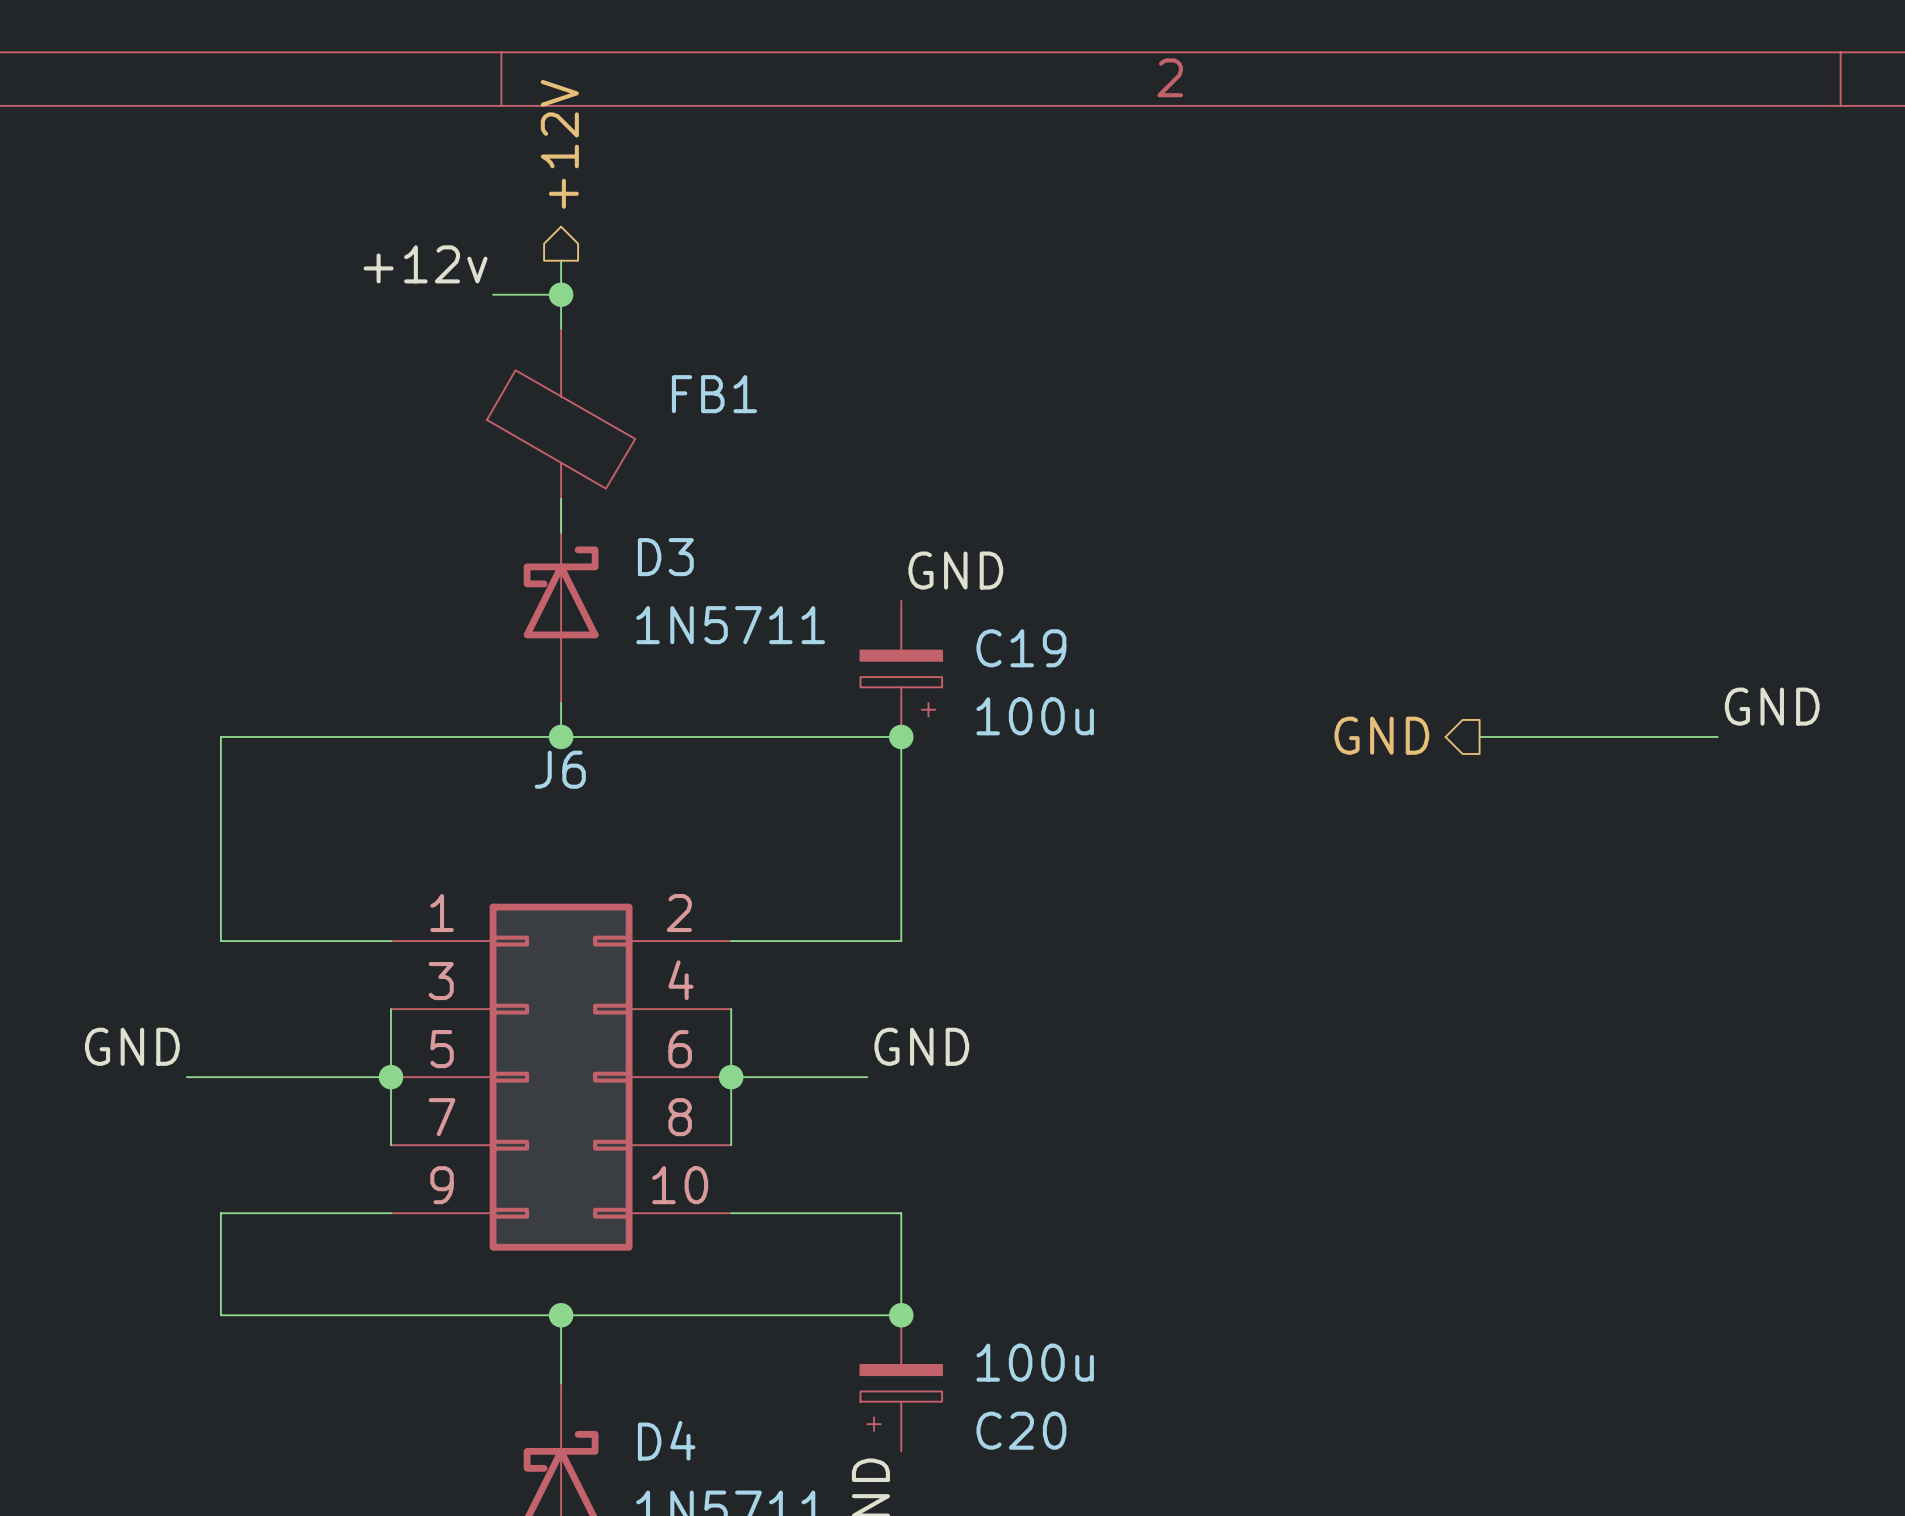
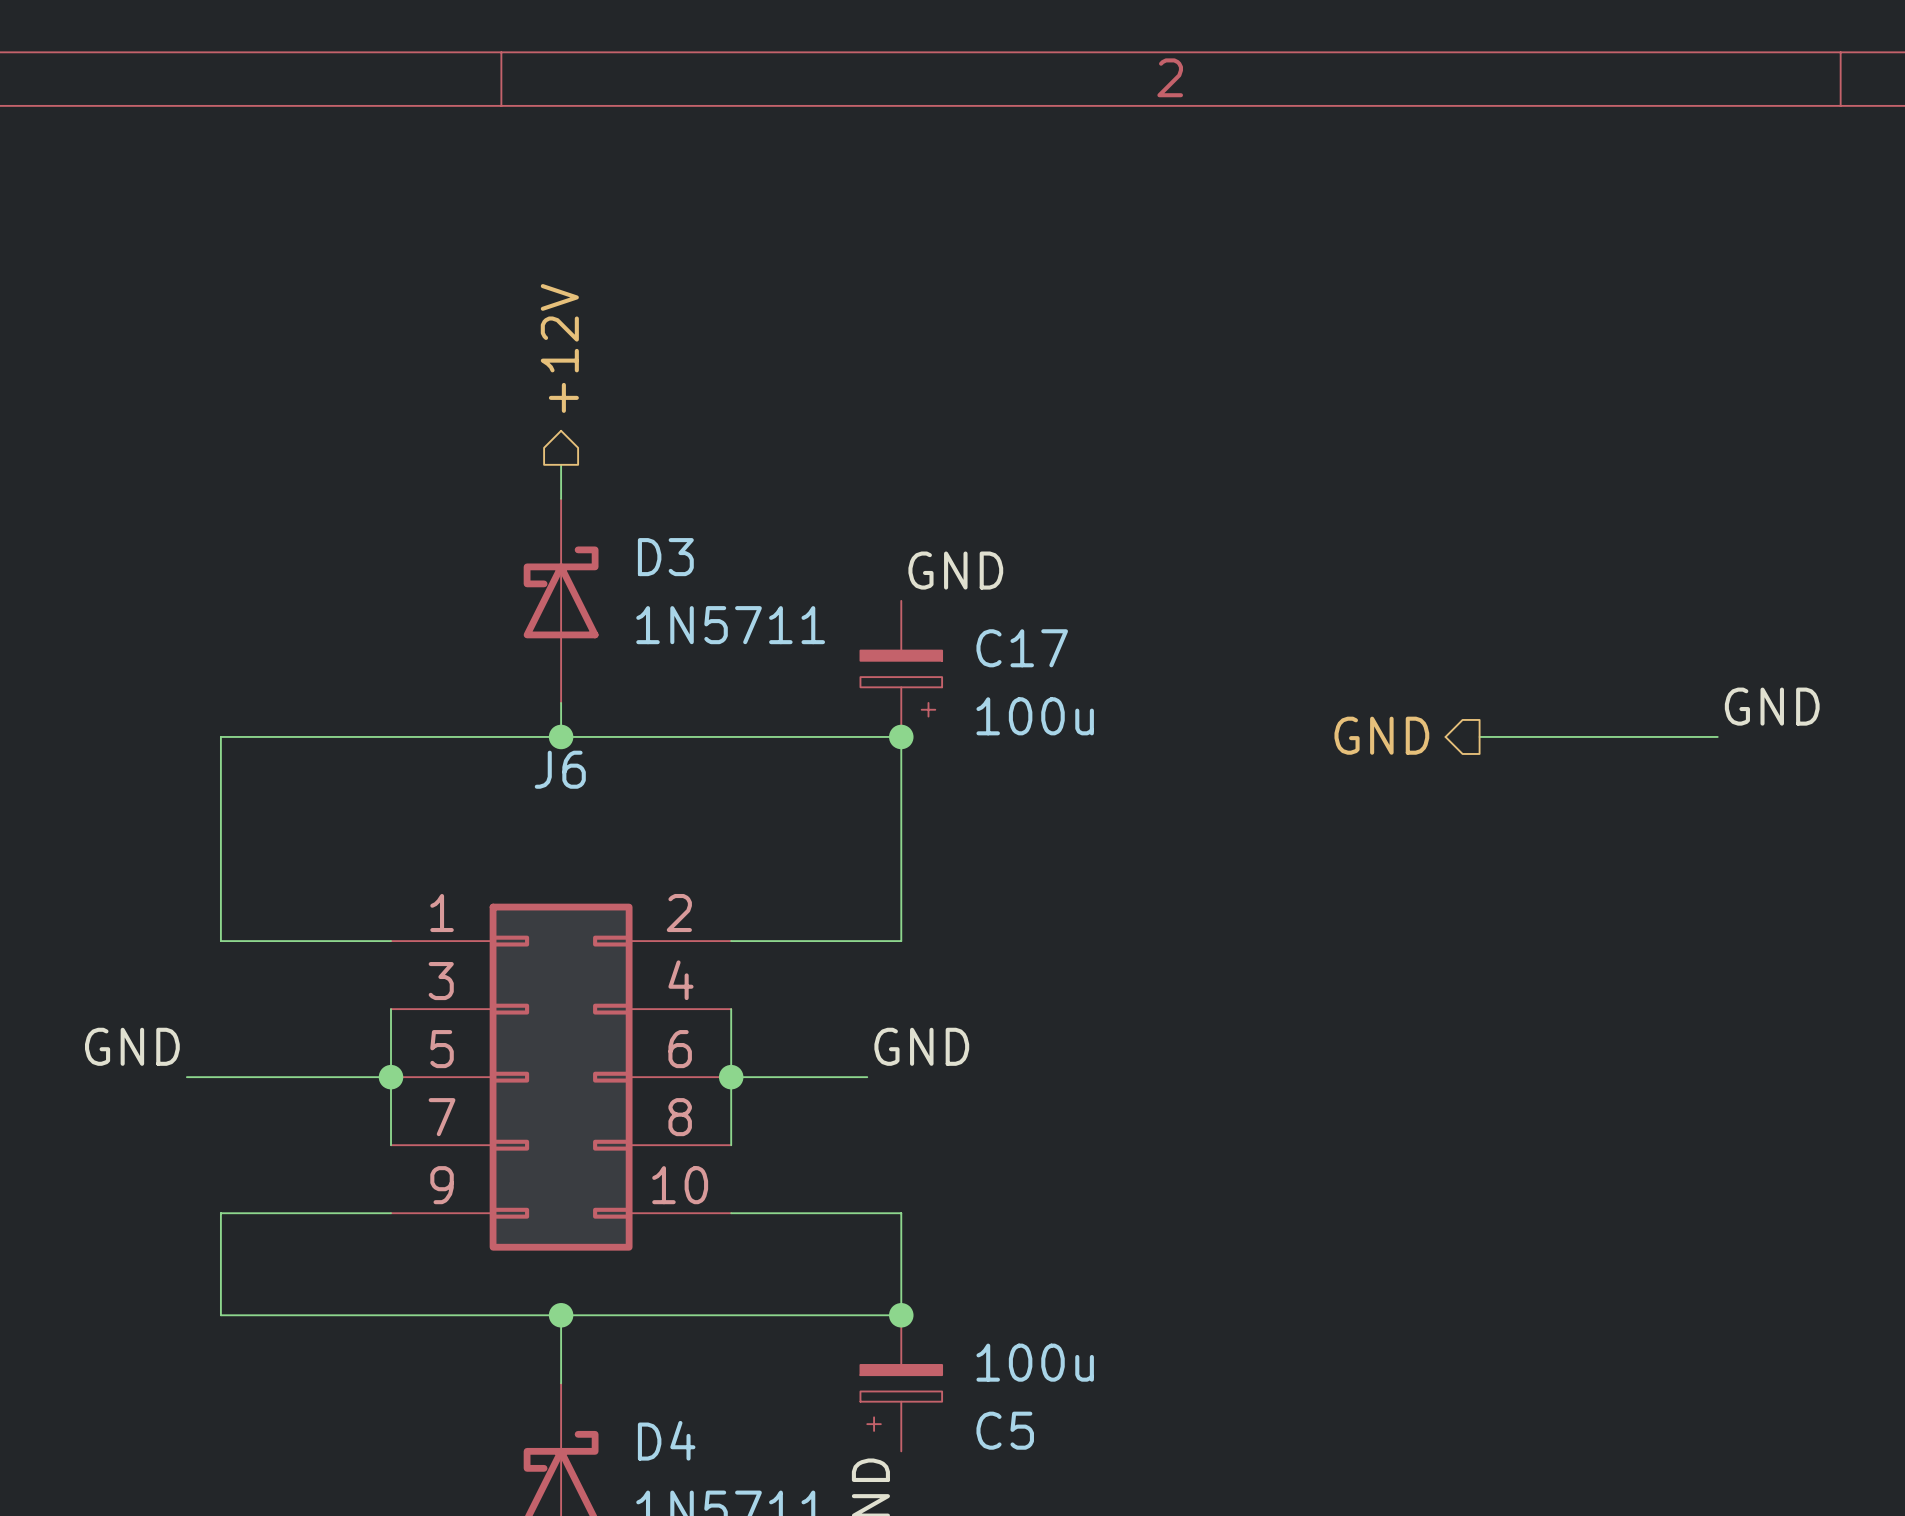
hierarchical label position: +12V (559, 144) -> +12V (559, 348)
wire: (561, 260) (561, 328) -> none
label: +12v (425, 264) -> none
wire: (493, 294) (561, 294) -> none
junction: (561, 294) -> none
FB1: (561, 430) -> none
C19 name: C19 (1021, 648) -> C17 (1022, 648)
C20 name: C20 (1021, 1430) -> C5 (1005, 1430)

